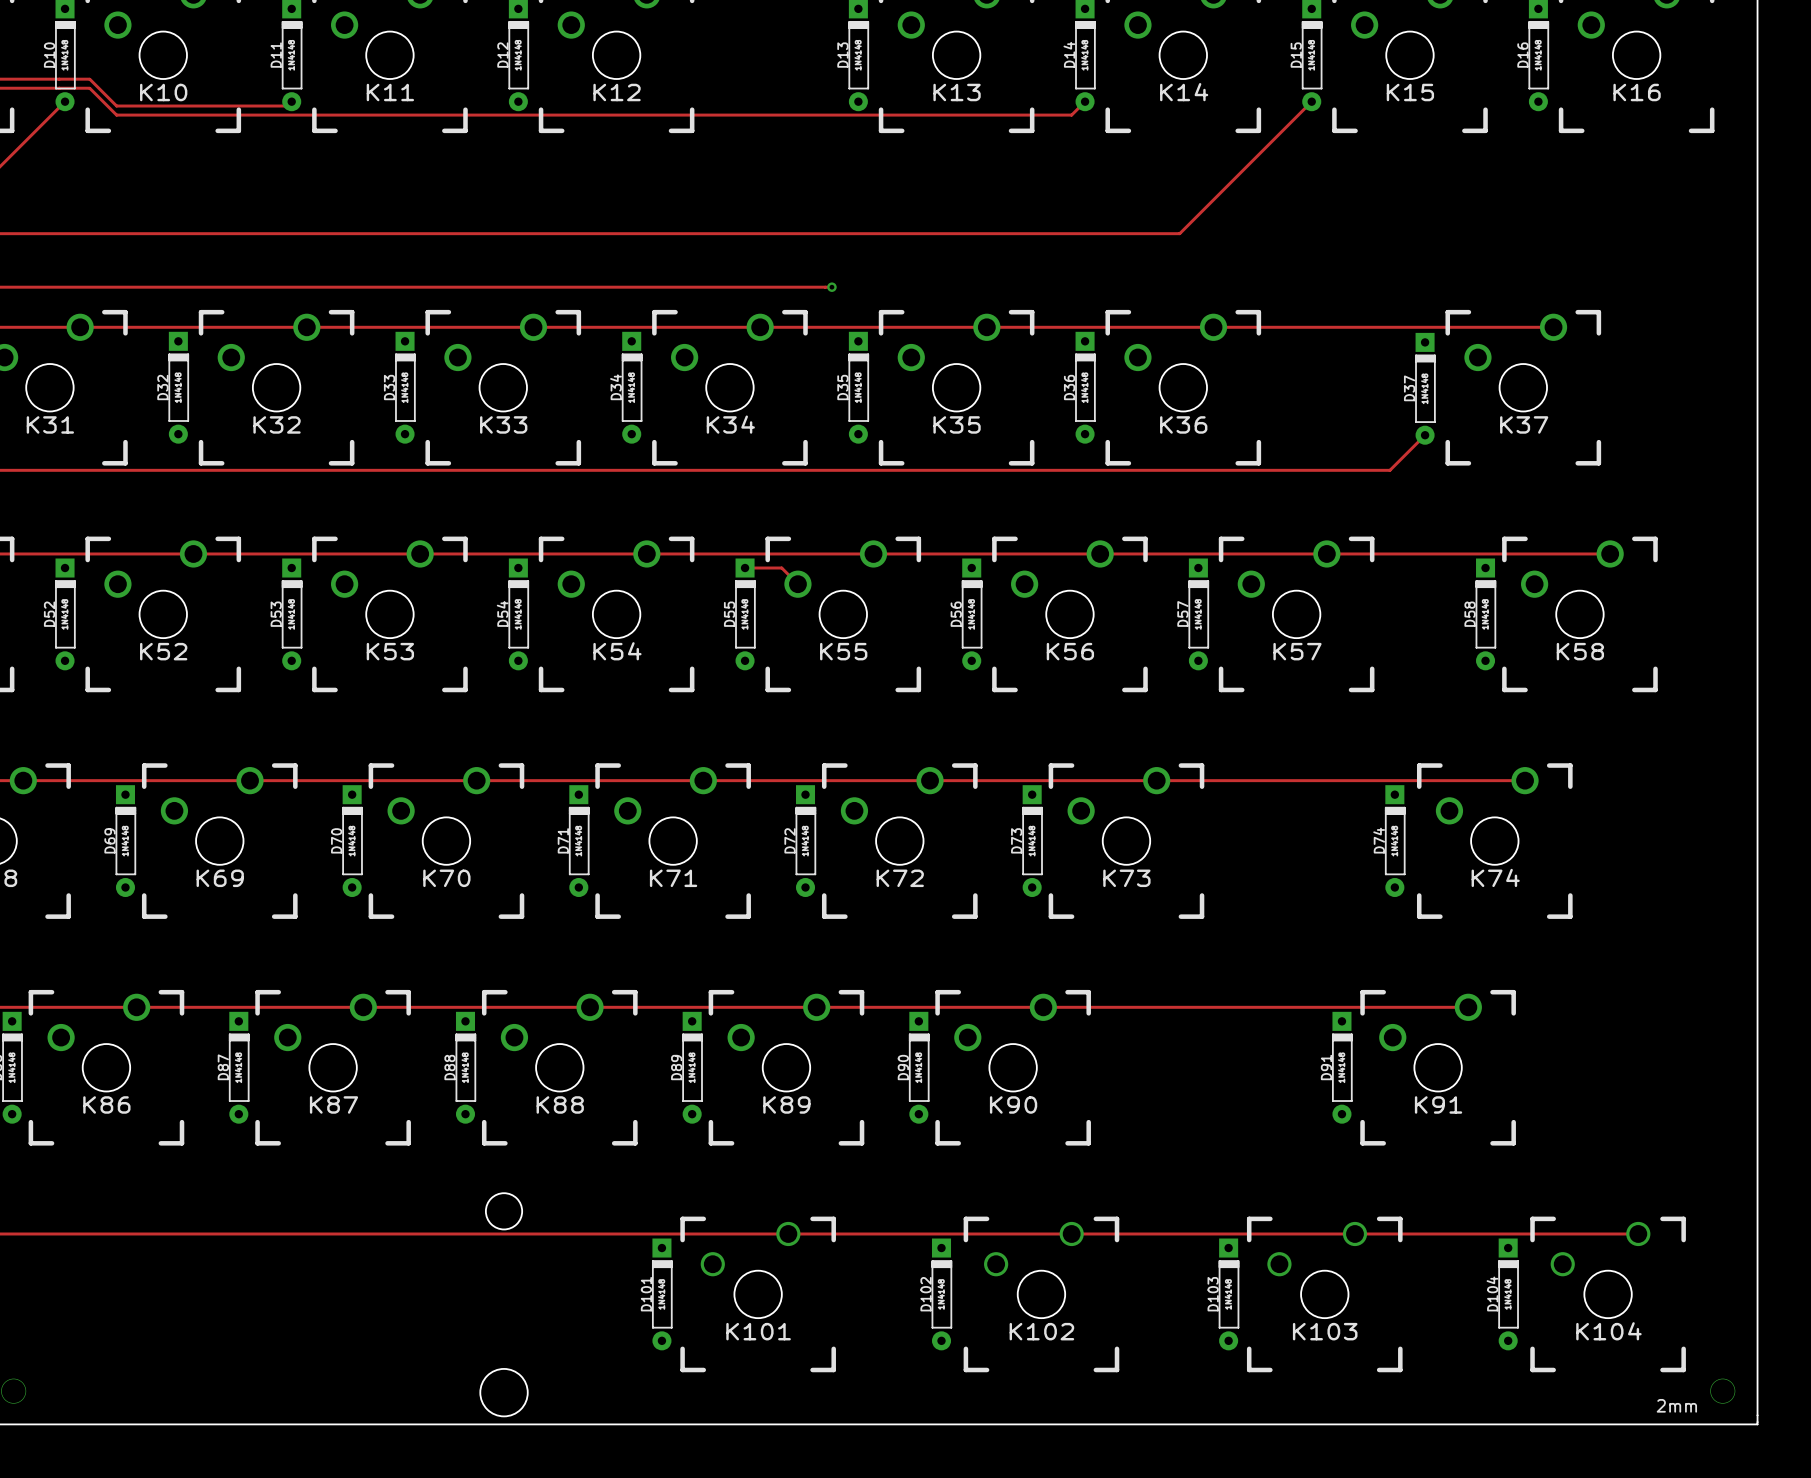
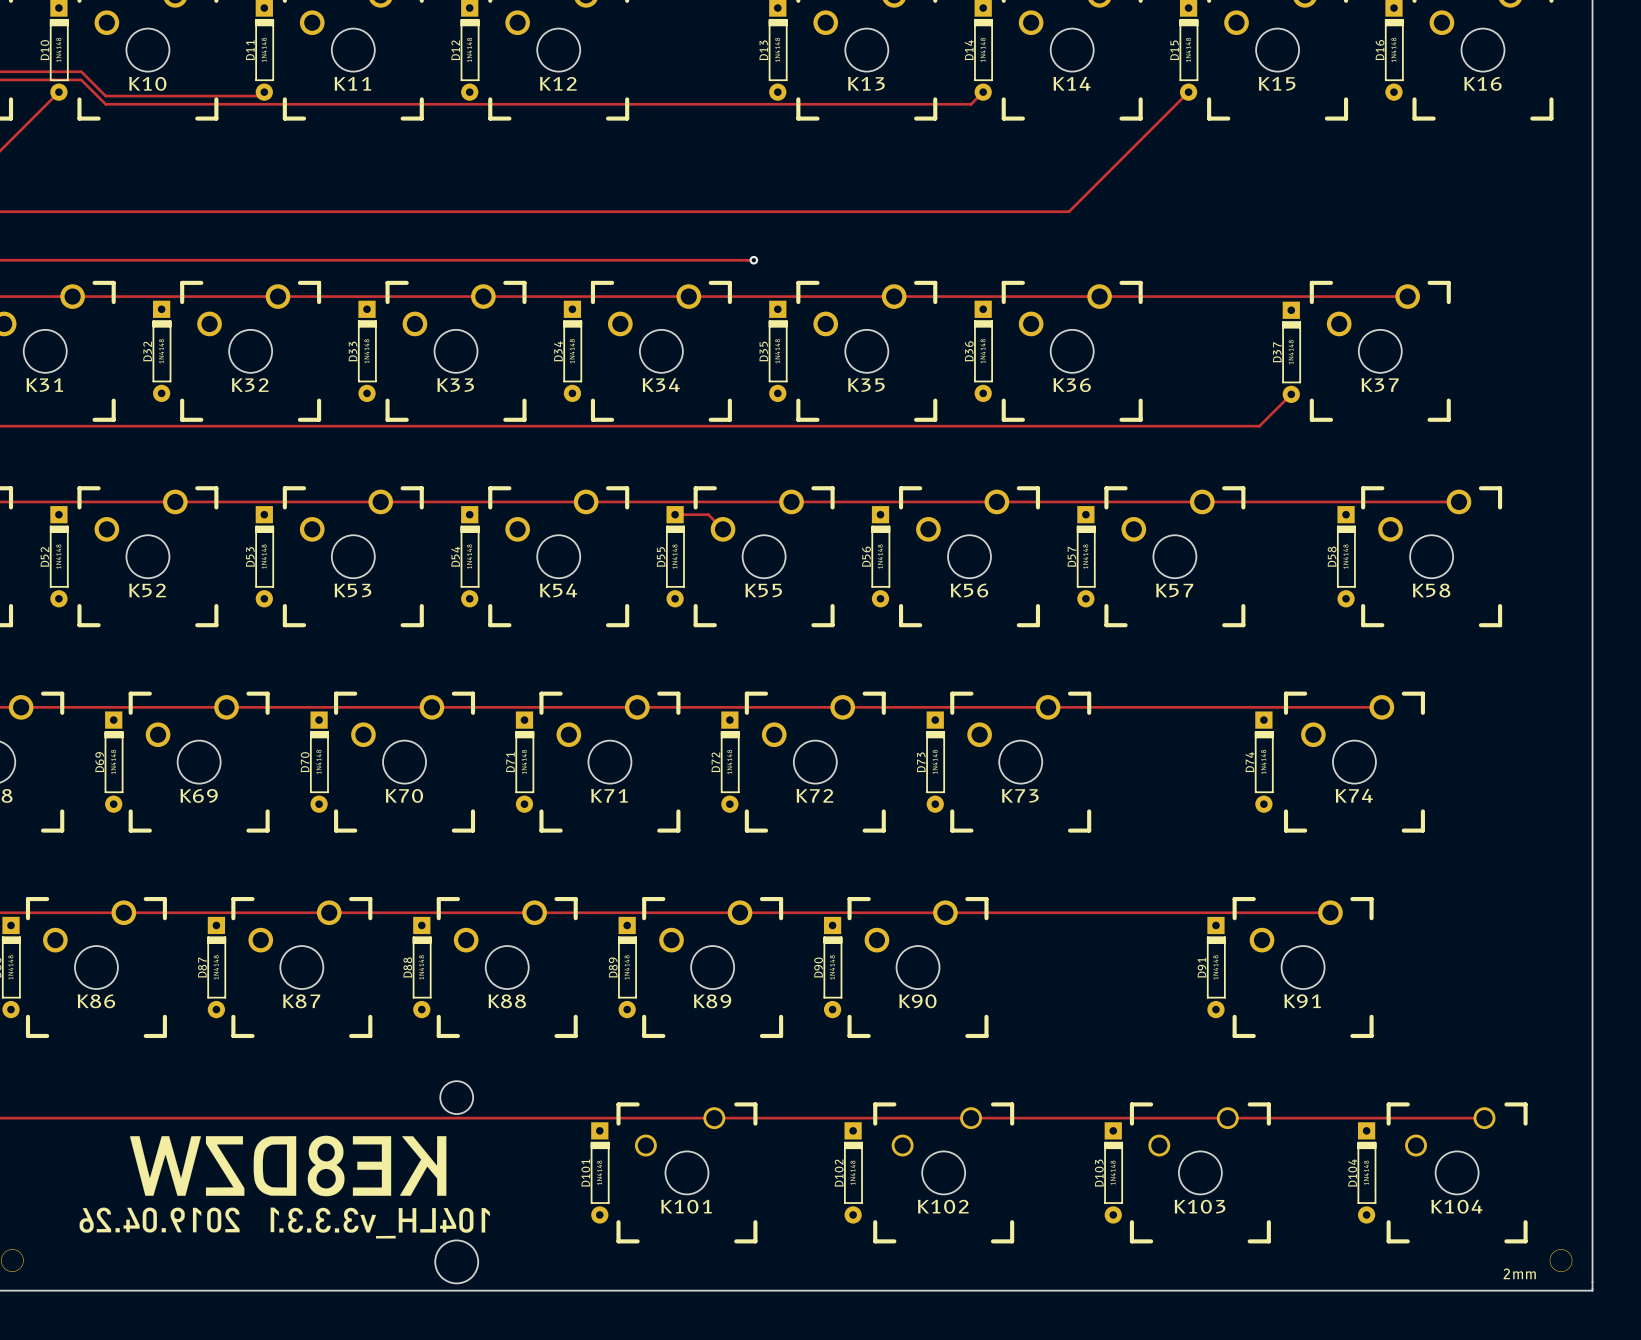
drawing: none -> [79, 1135, 490, 1239]

